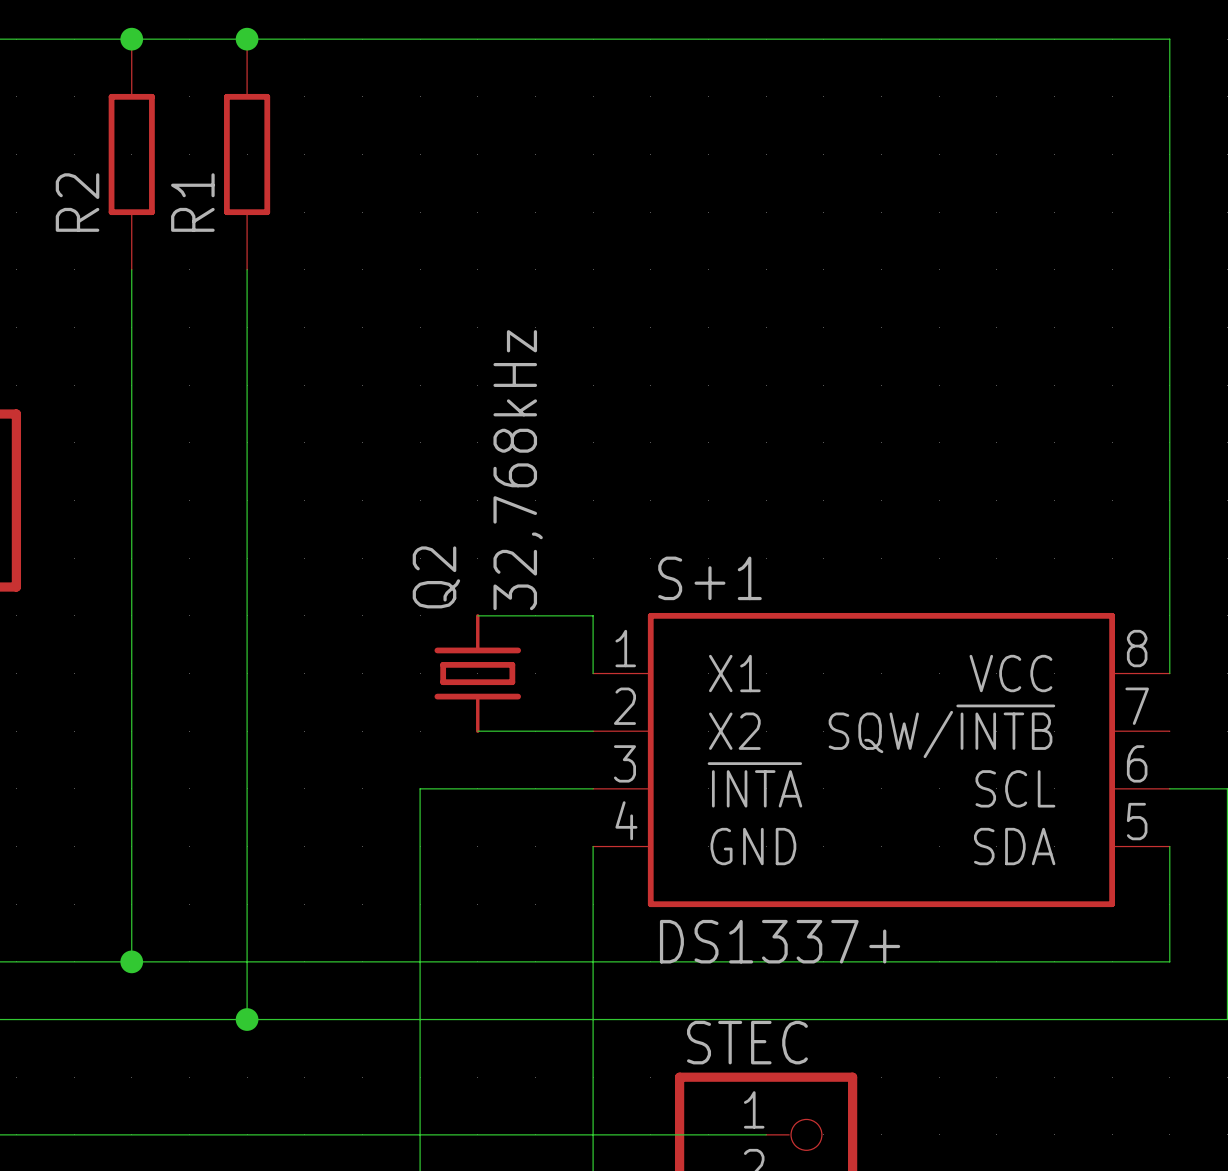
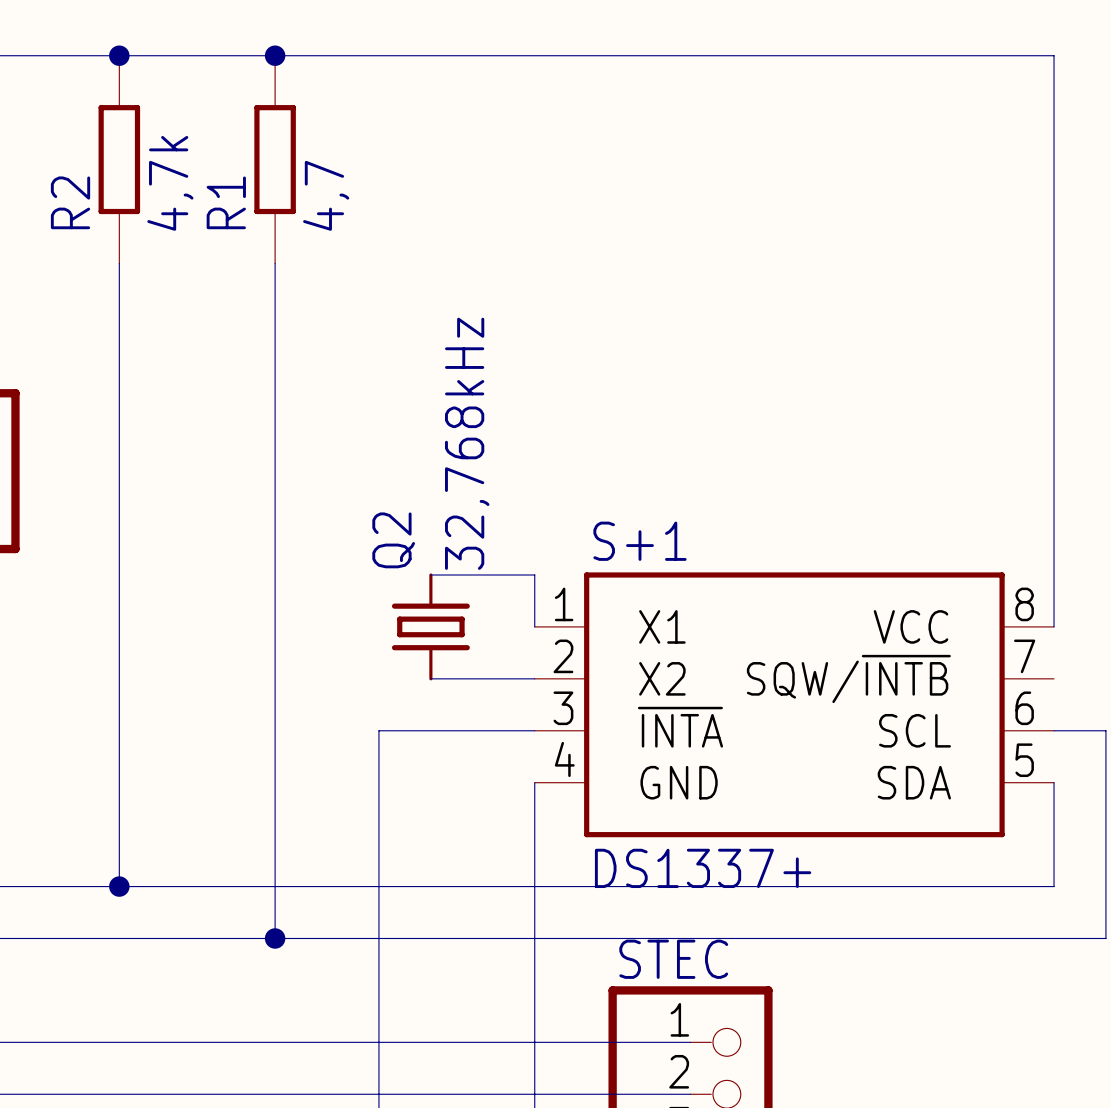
junction position: (247, 39) -> (275, 55)
R1 position: (247, 154) -> (275, 159)
R2 value: none -> 4,7k (170, 183)
R1 value: none -> 4,7 (326, 195)
wire: (247, 269) (247, 1019) -> (275, 263) (275, 938)
junction position: (247, 1019) -> (275, 938)

